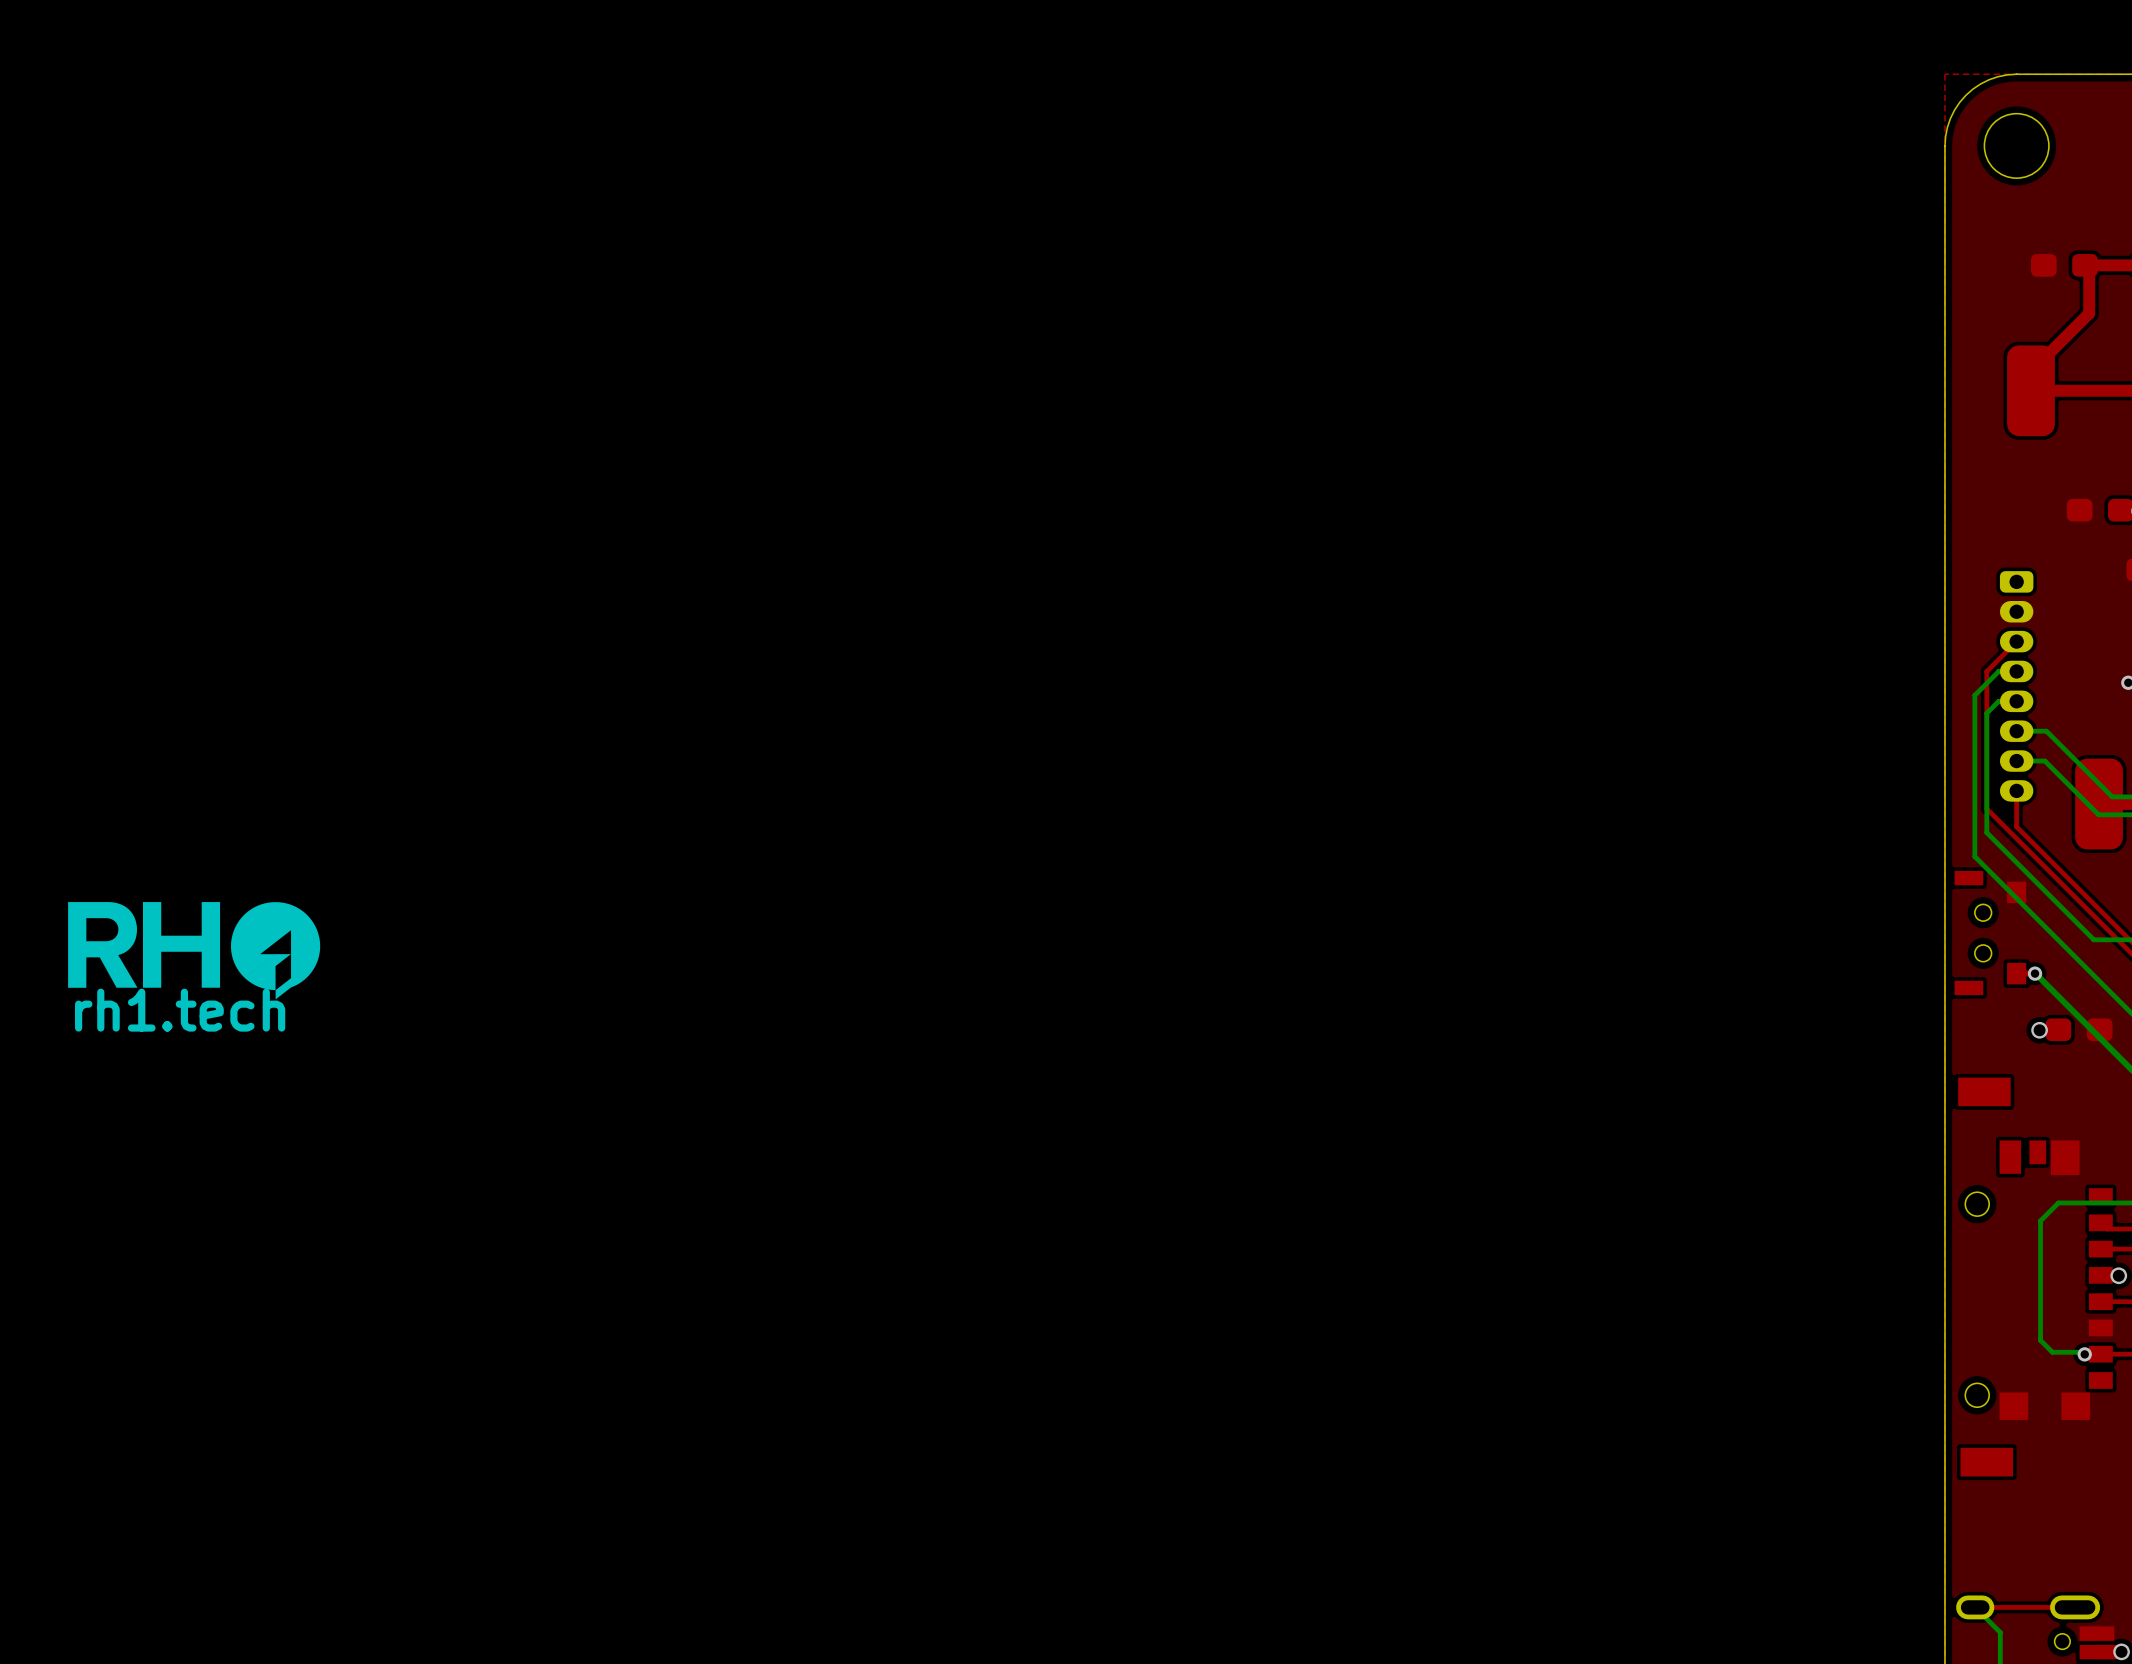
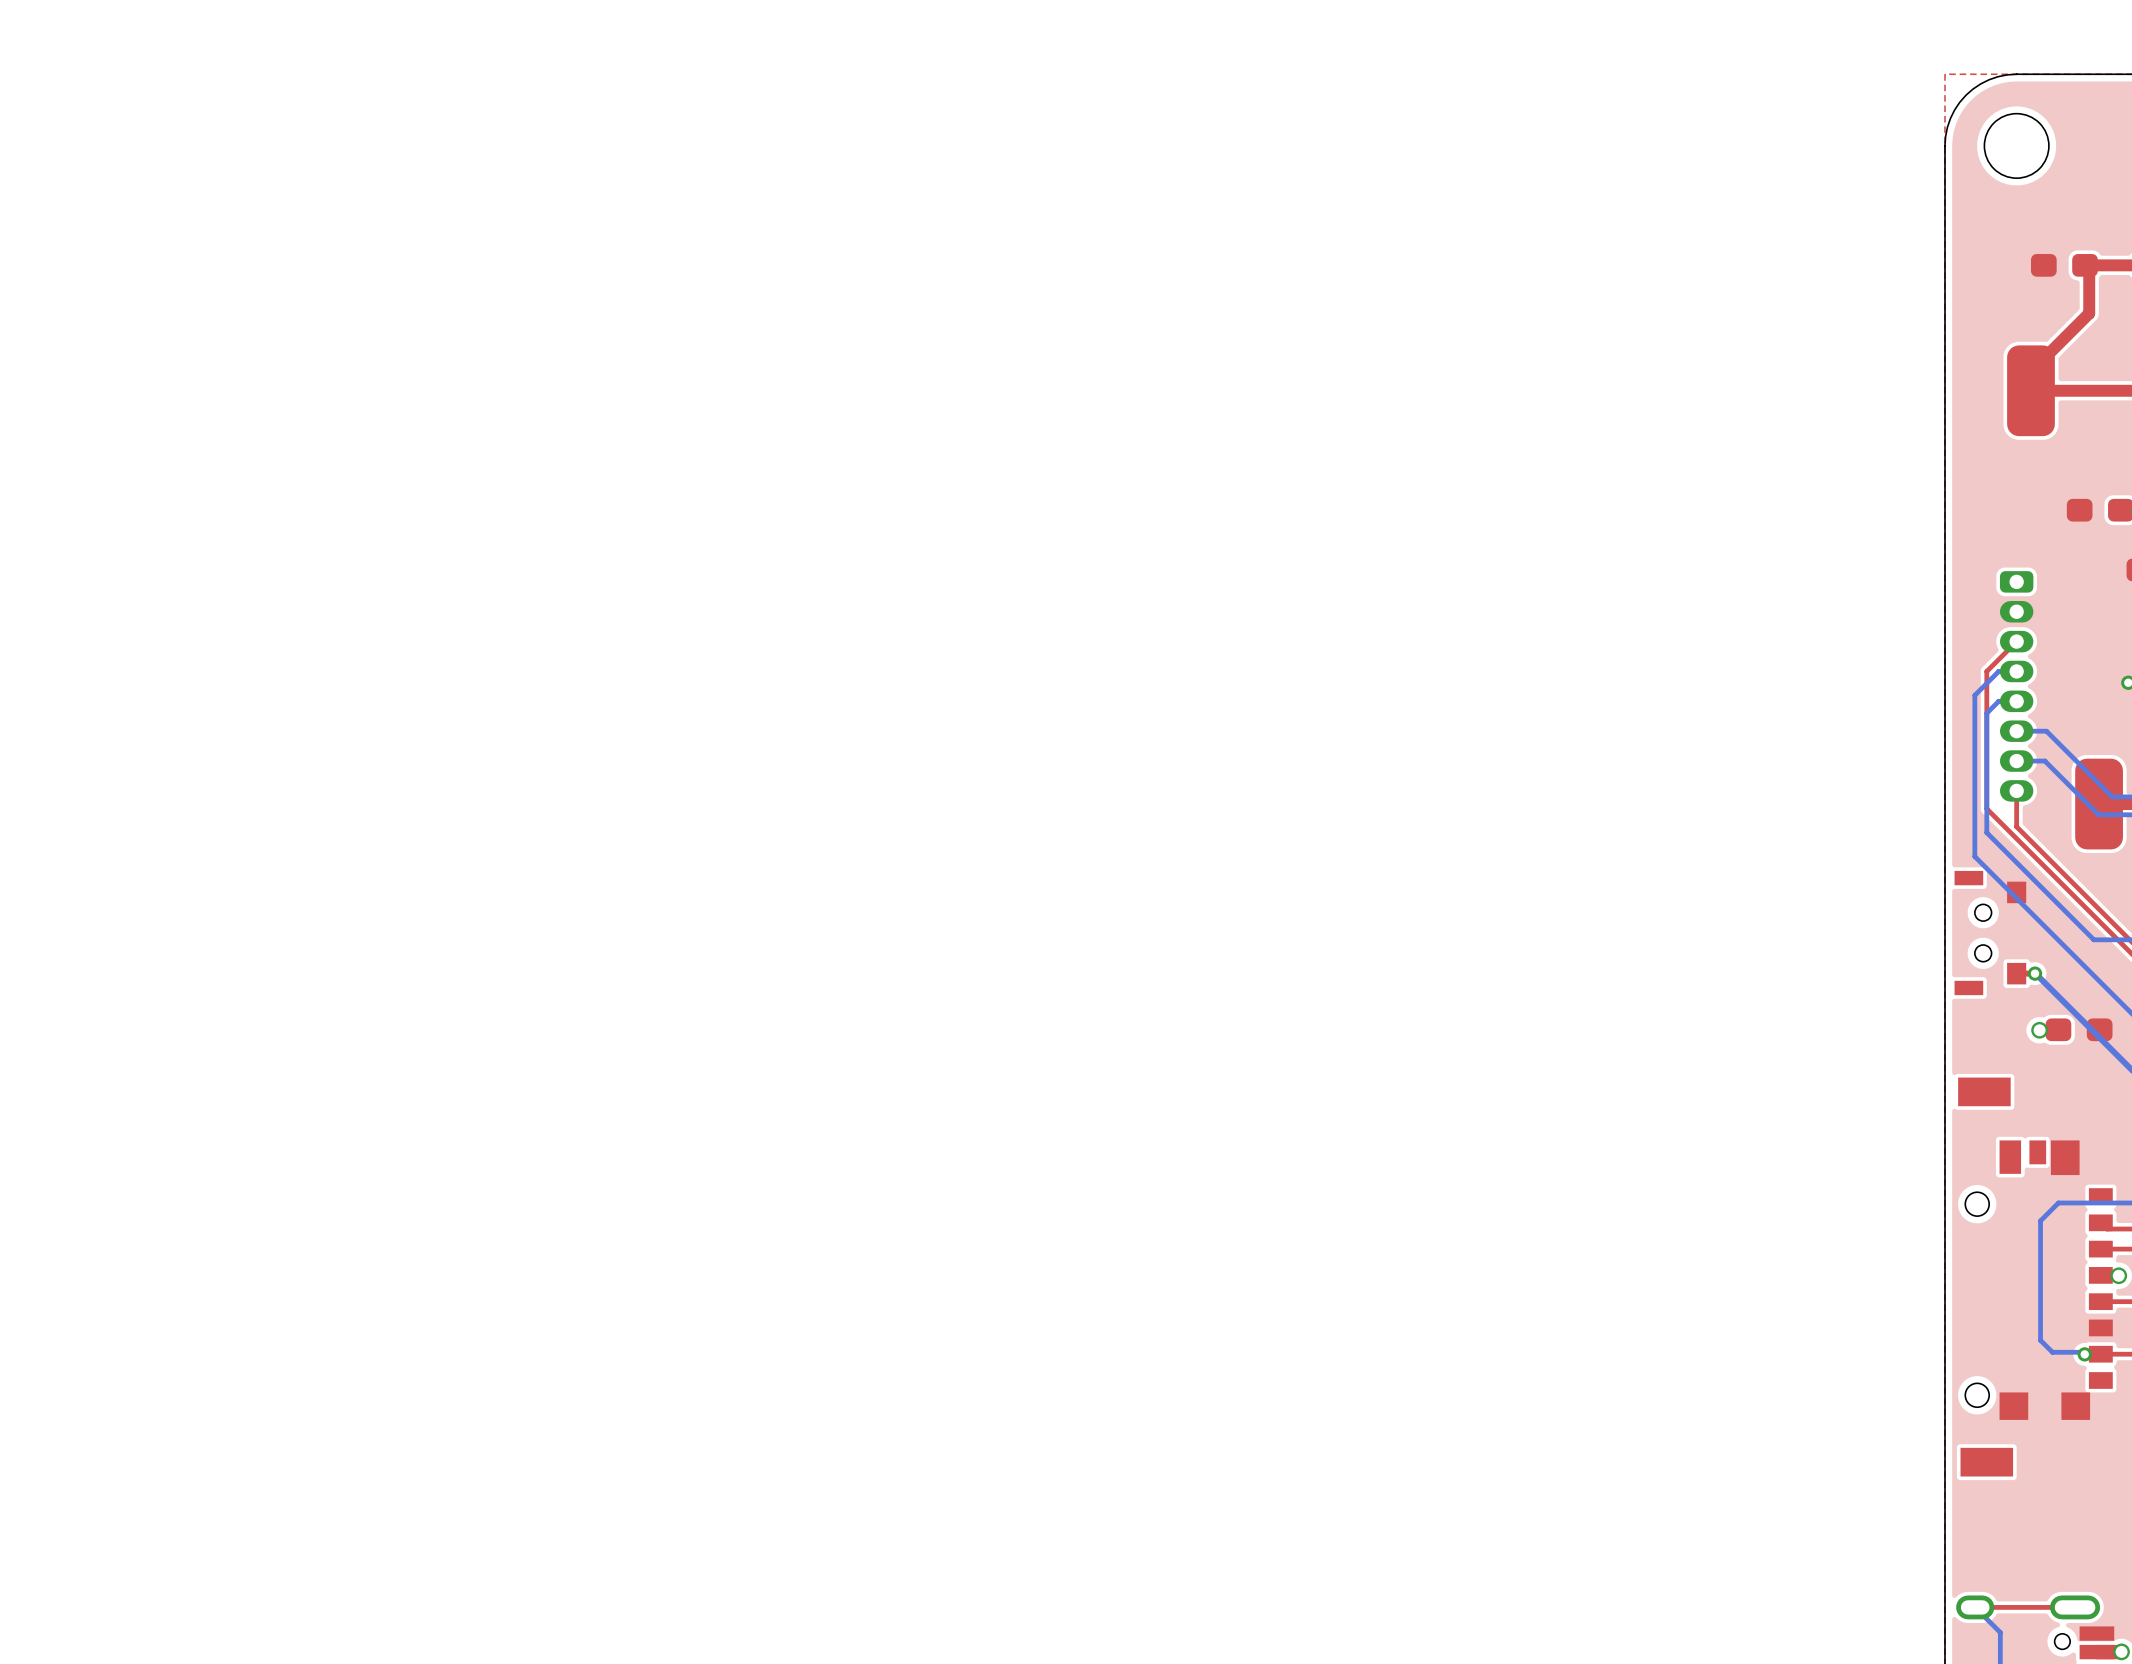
drawing: [68, 902, 321, 1000] -> none
text: rh1.tech (180, 1010) -> none

